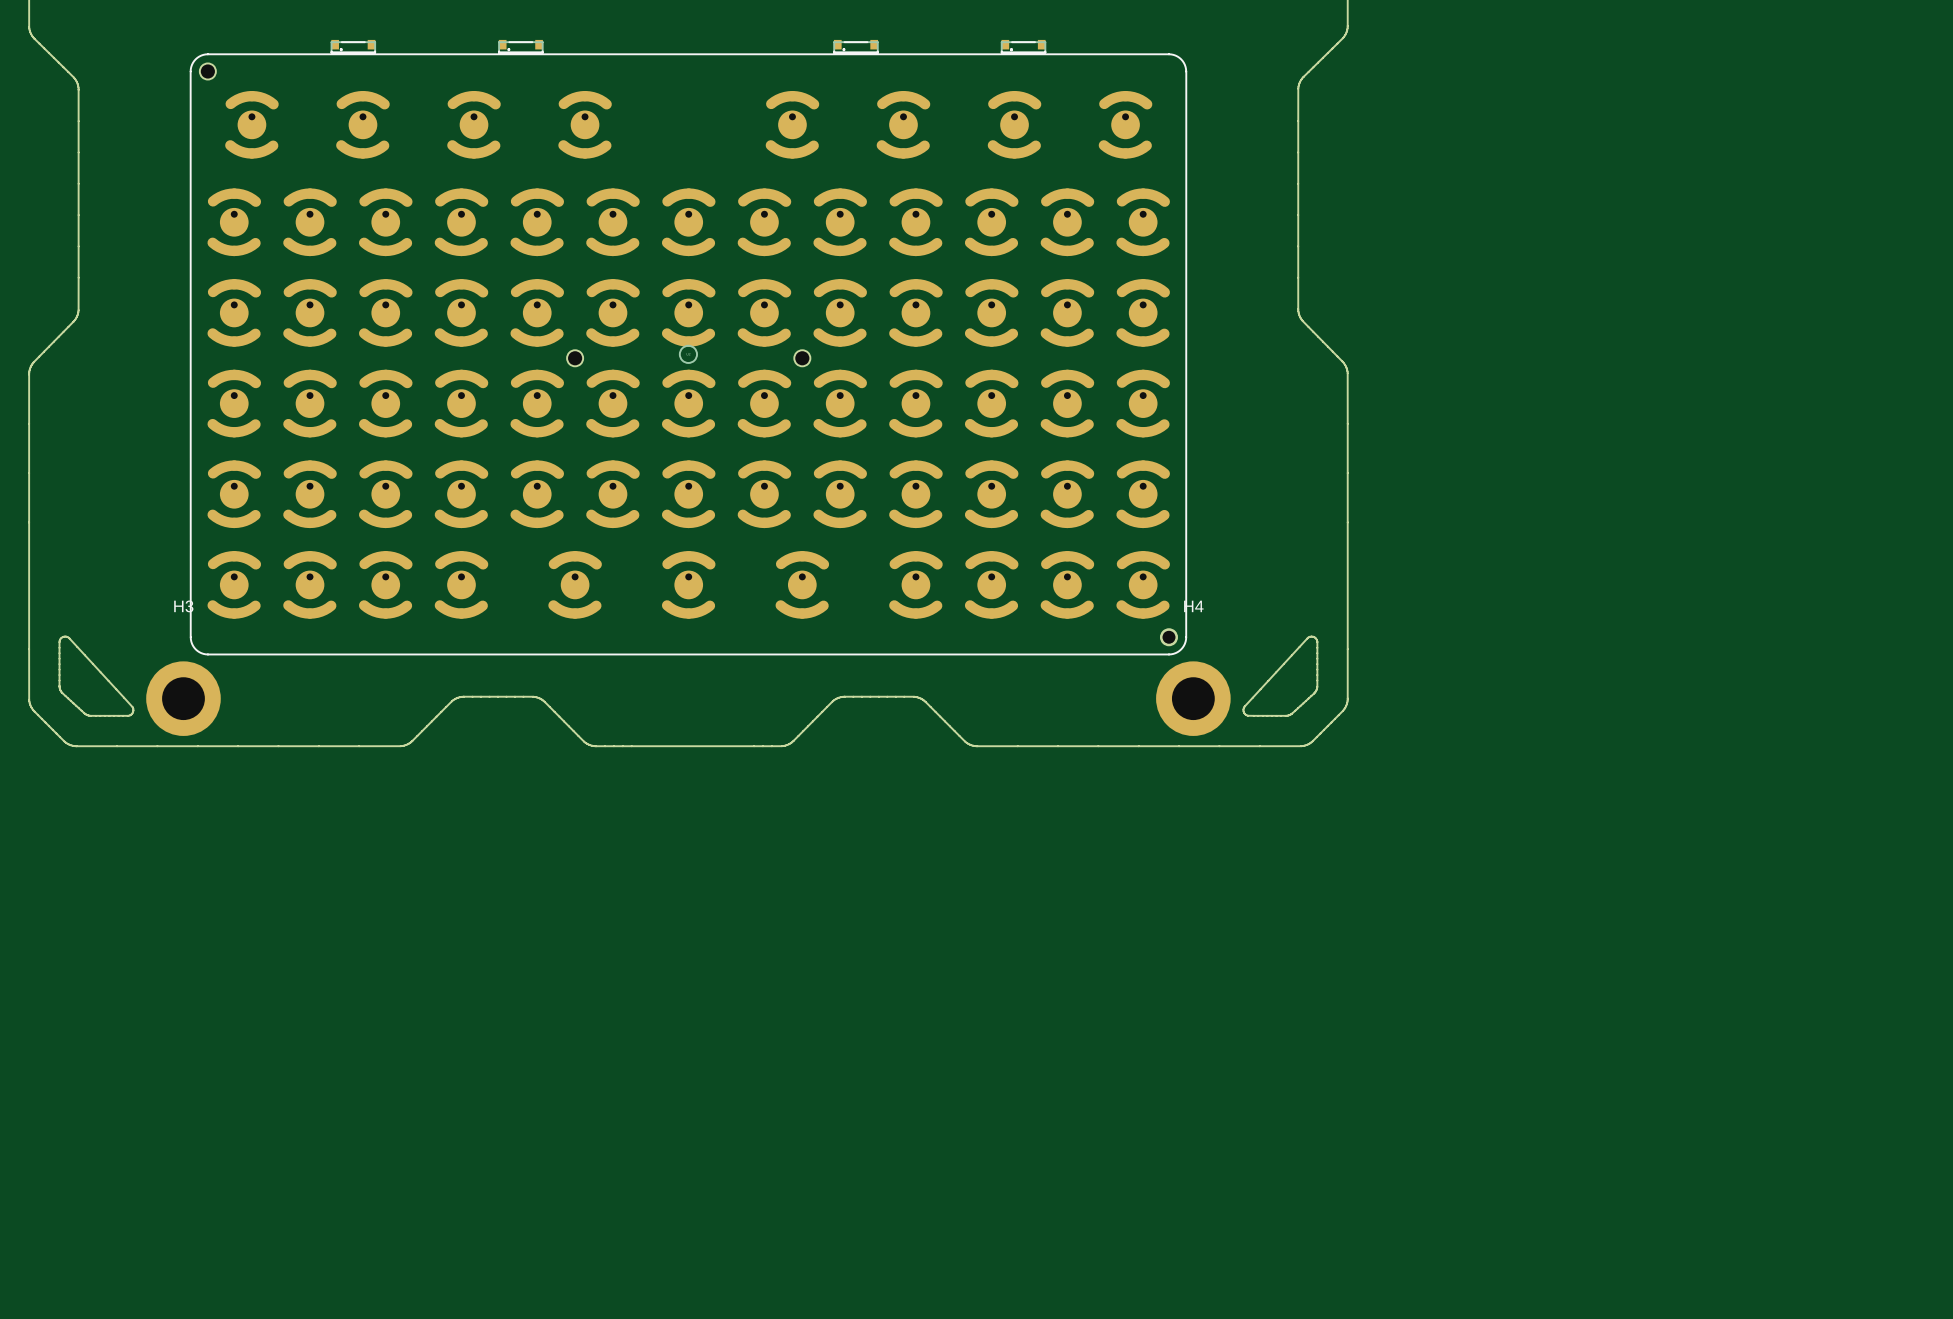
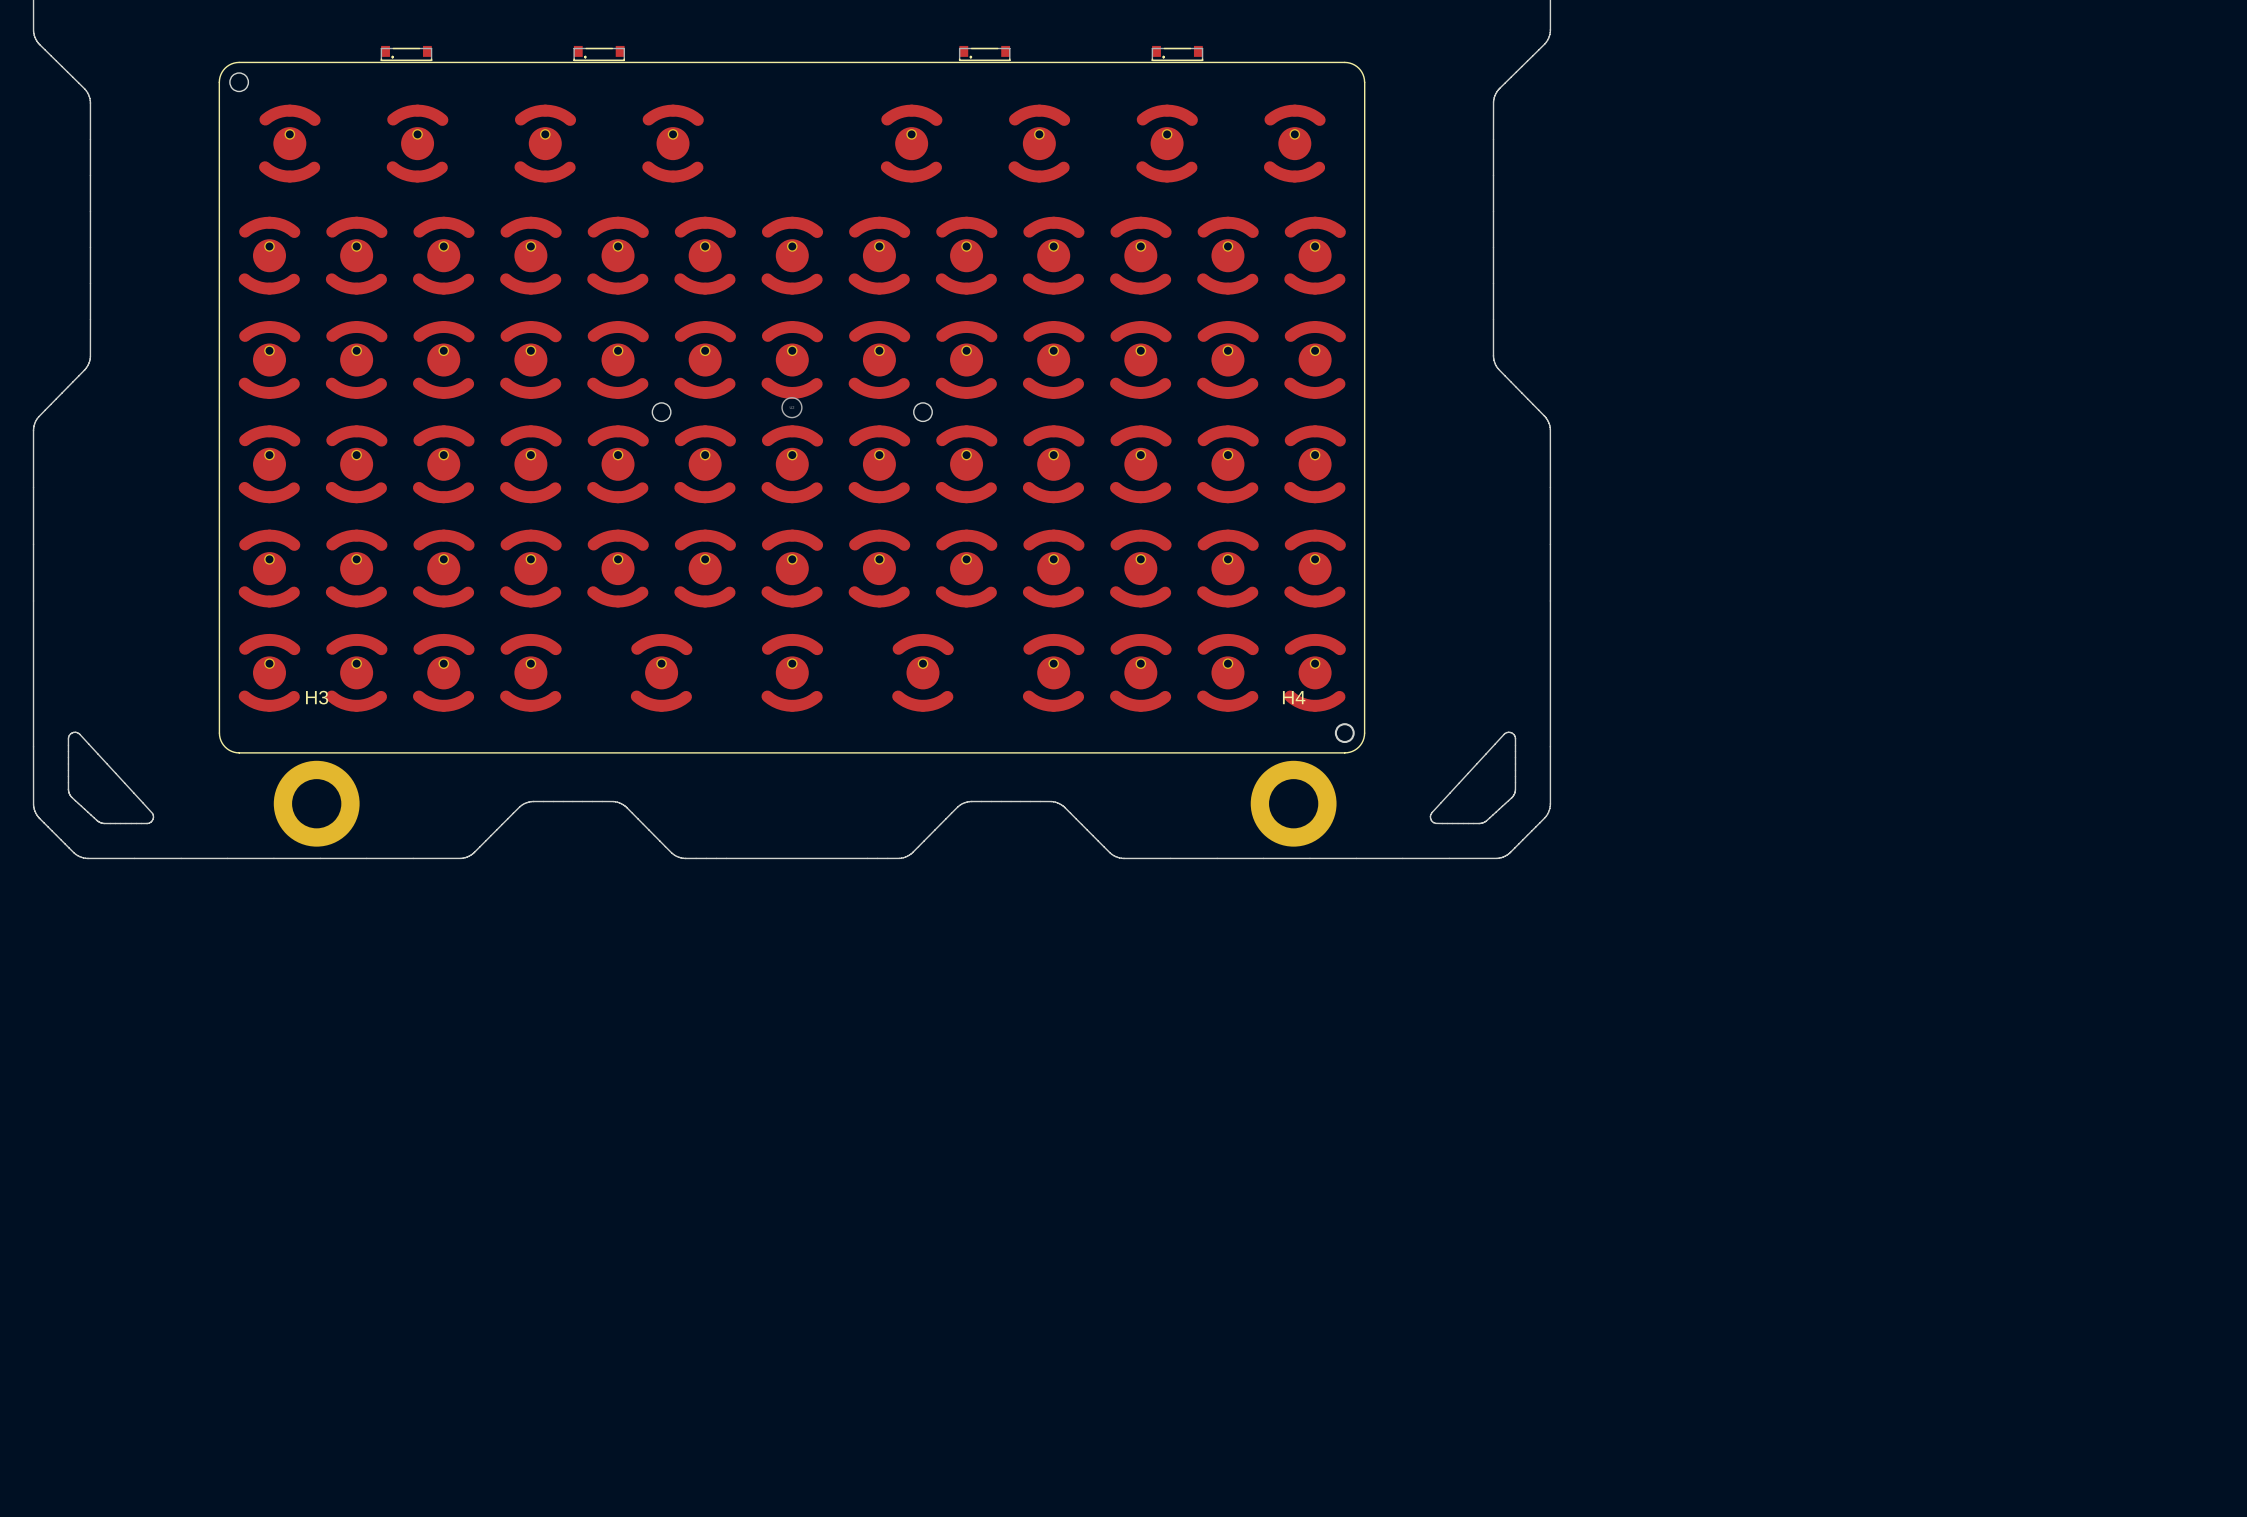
H3 position: (183, 698) -> (316, 803)
H4 position: (1193, 698) -> (1293, 803)

